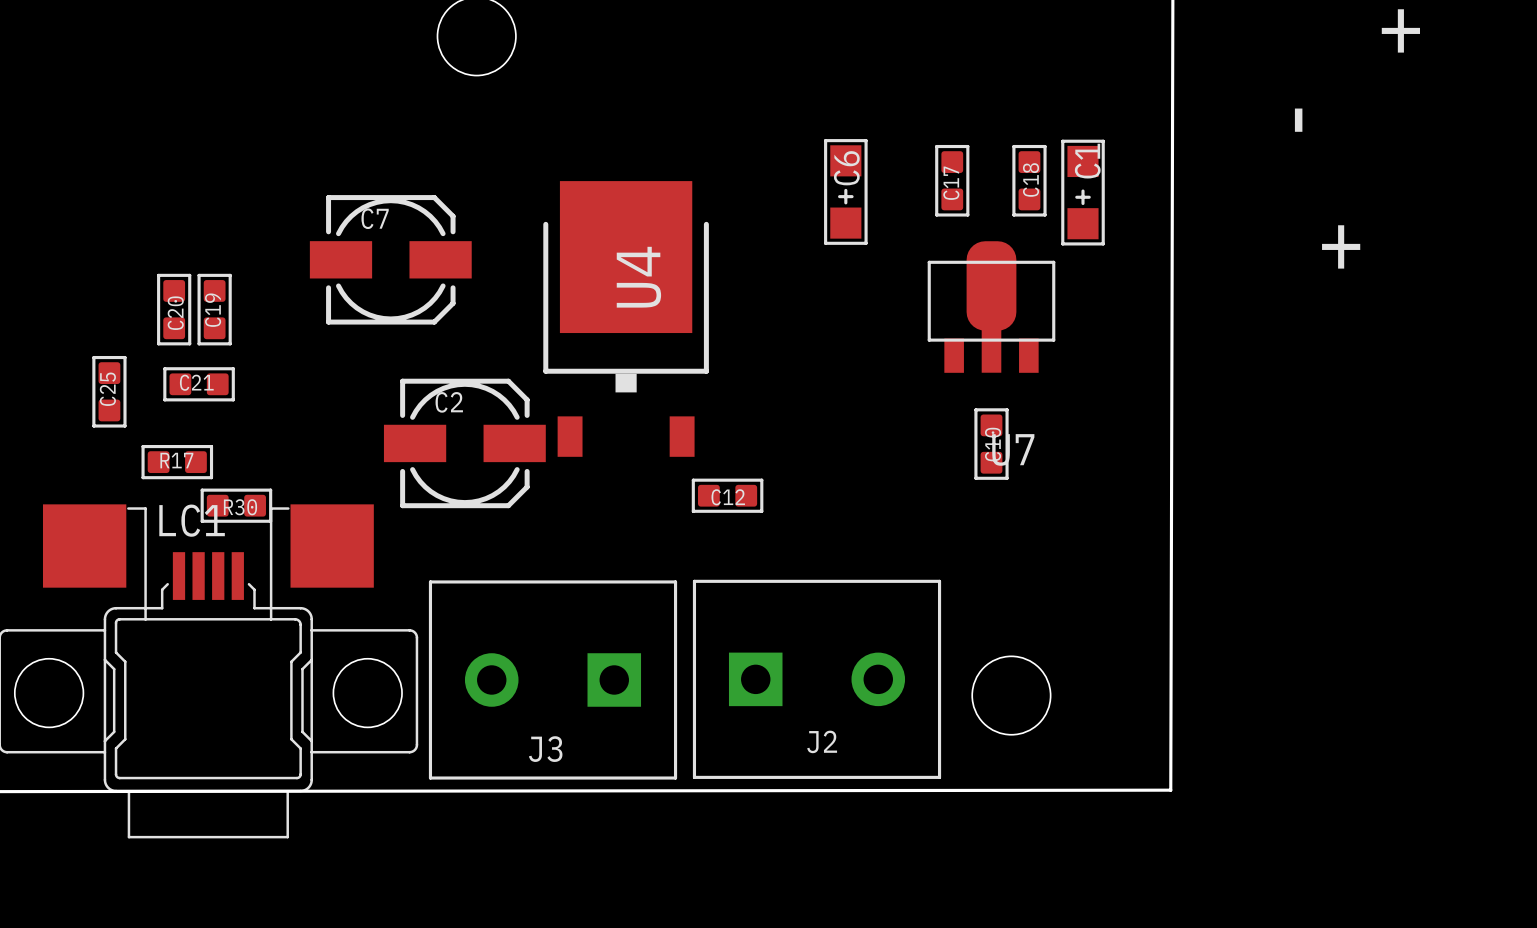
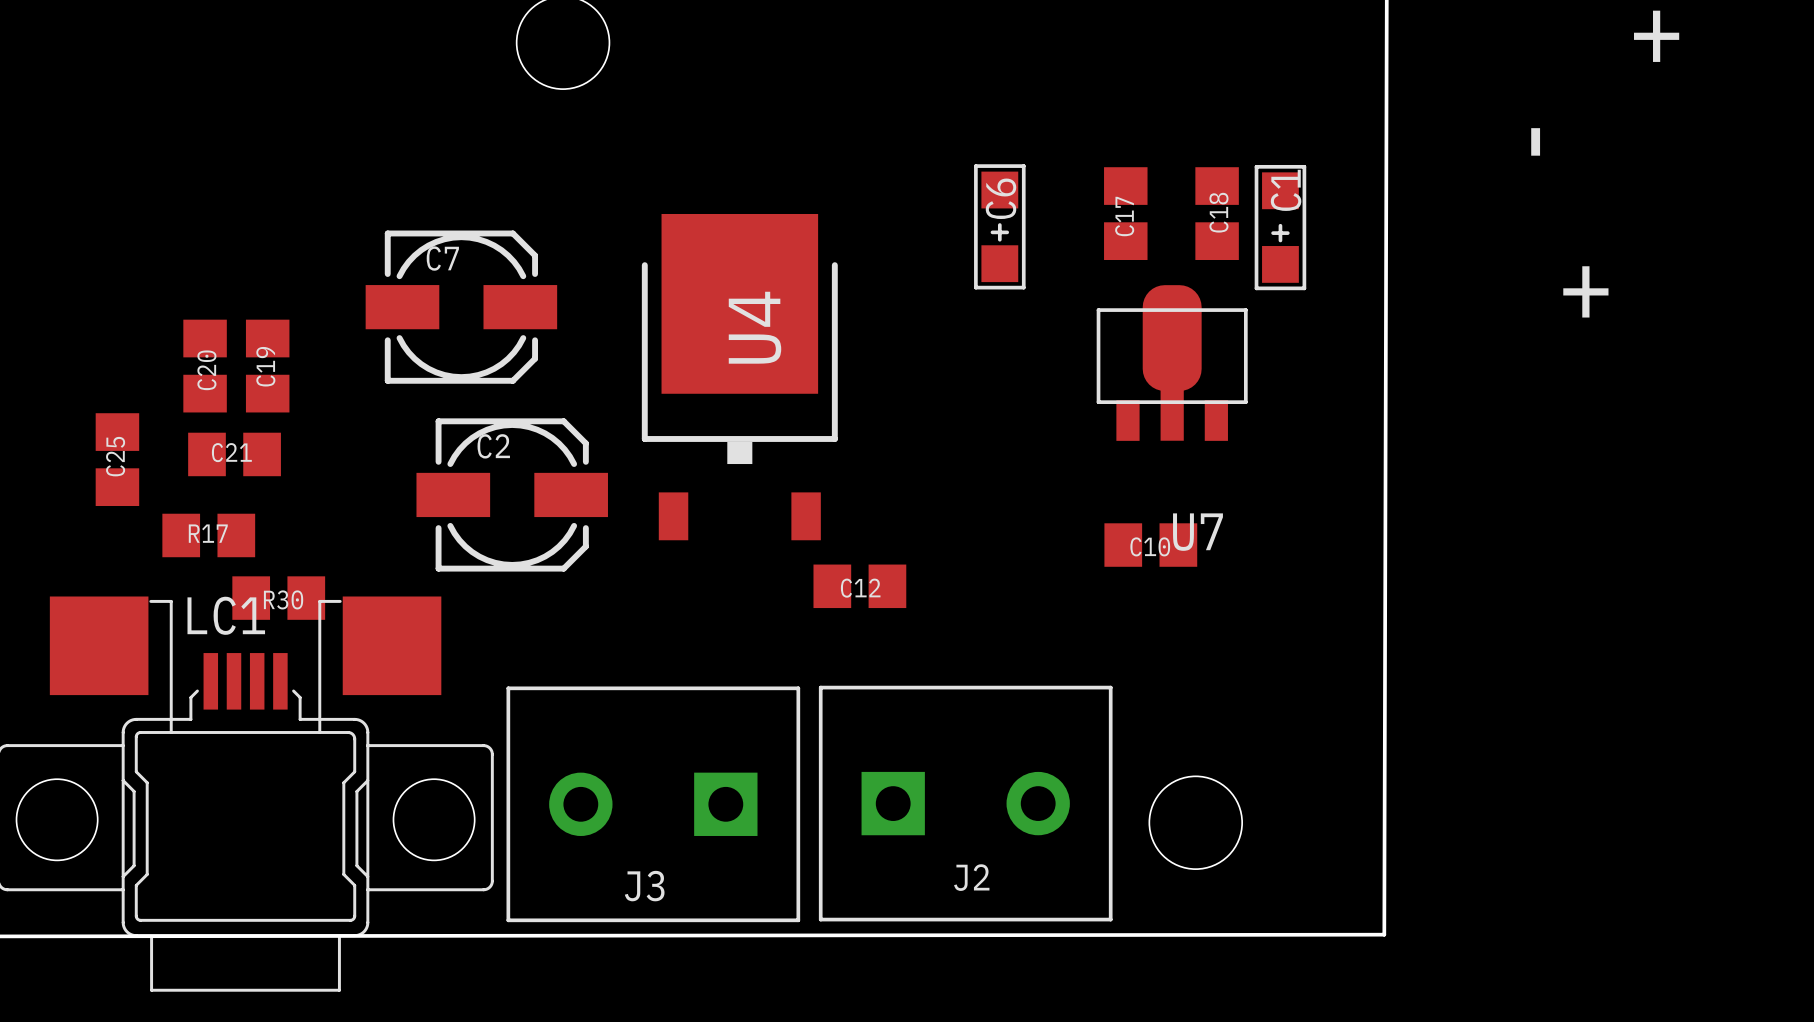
C17 footprint: [935, 144, 970, 217] -> [1104, 167, 1148, 260]
C18 footprint: [1012, 144, 1047, 217] -> [1195, 167, 1239, 260]
C20 footprint: [157, 273, 192, 346] -> [183, 319, 227, 413]
C19 footprint: [197, 273, 232, 346] -> [245, 319, 290, 413]
C25 footprint: [92, 355, 127, 428] -> [95, 413, 140, 507]
C21 footprint: [163, 367, 235, 402] -> [188, 432, 281, 477]
C10 footprint: [974, 408, 1009, 480] -> [1104, 523, 1198, 567]
C2 position: (464, 443) -> (512, 494)
R17 footprint: [141, 445, 214, 480] -> [162, 513, 256, 558]
C12 footprint: [691, 478, 764, 513] -> [813, 564, 907, 609]
R30 footprint: [200, 488, 273, 523] -> [232, 576, 326, 620]

